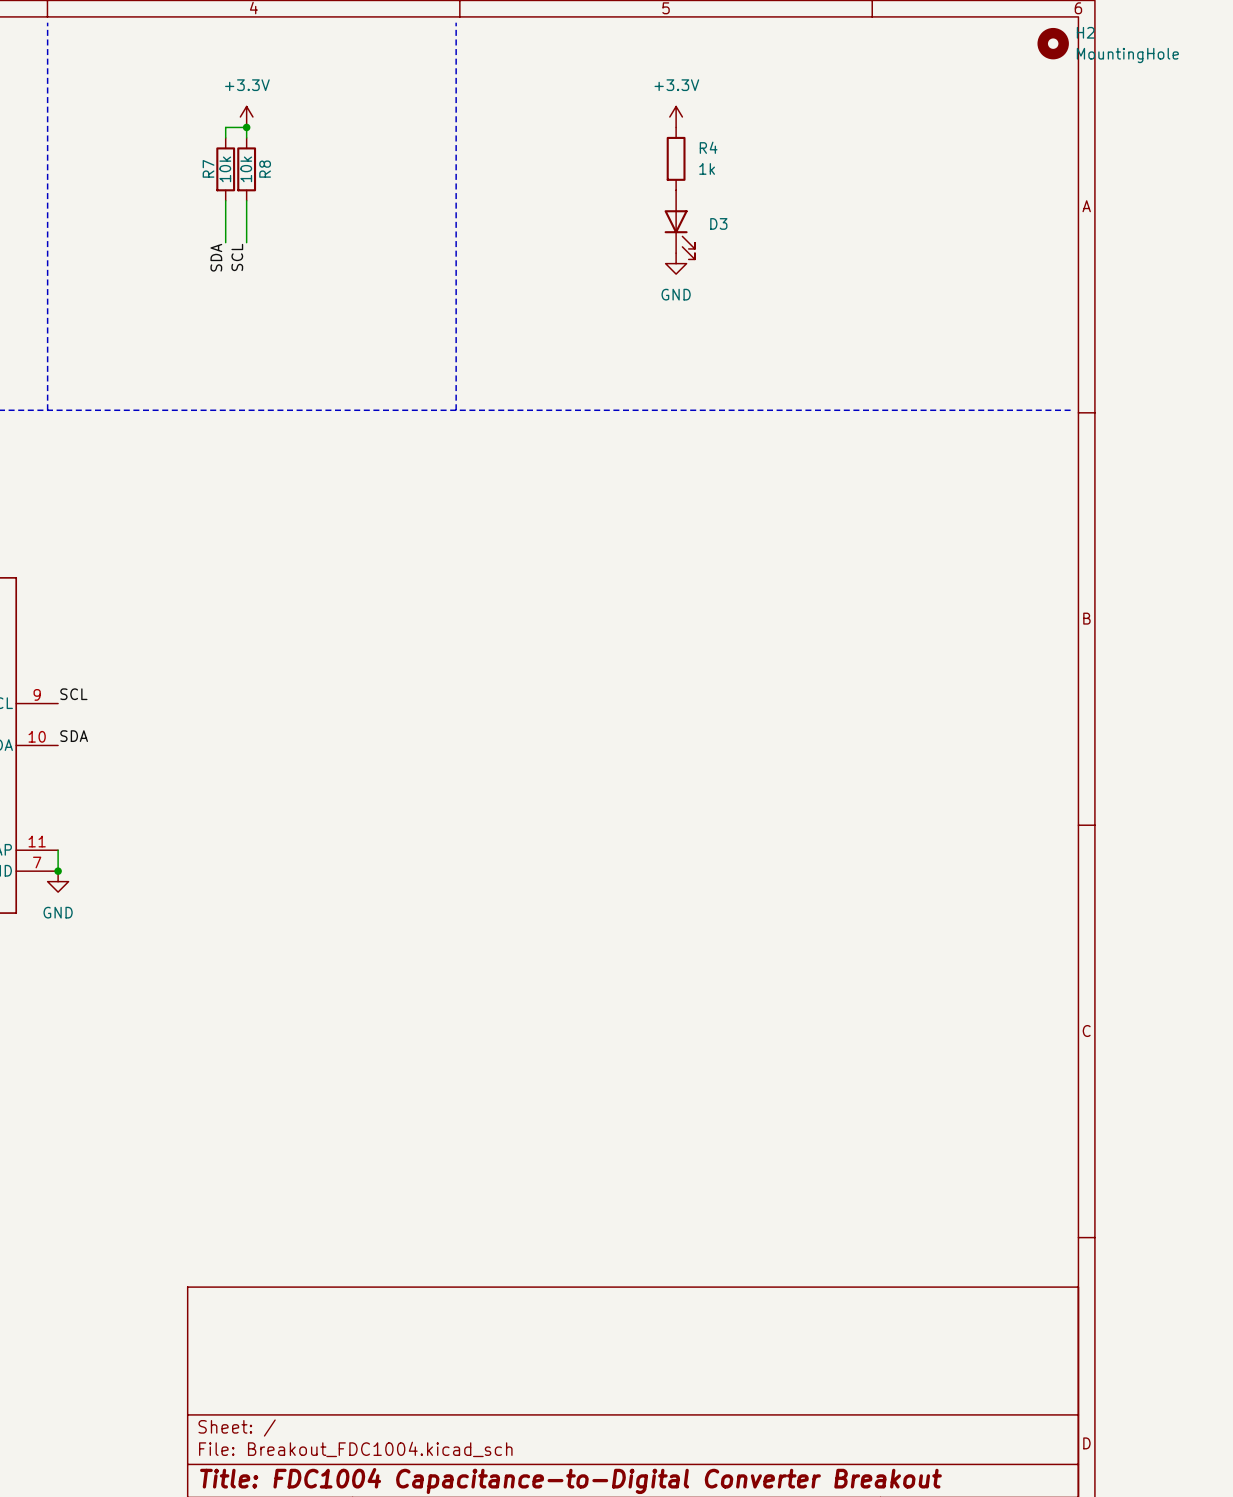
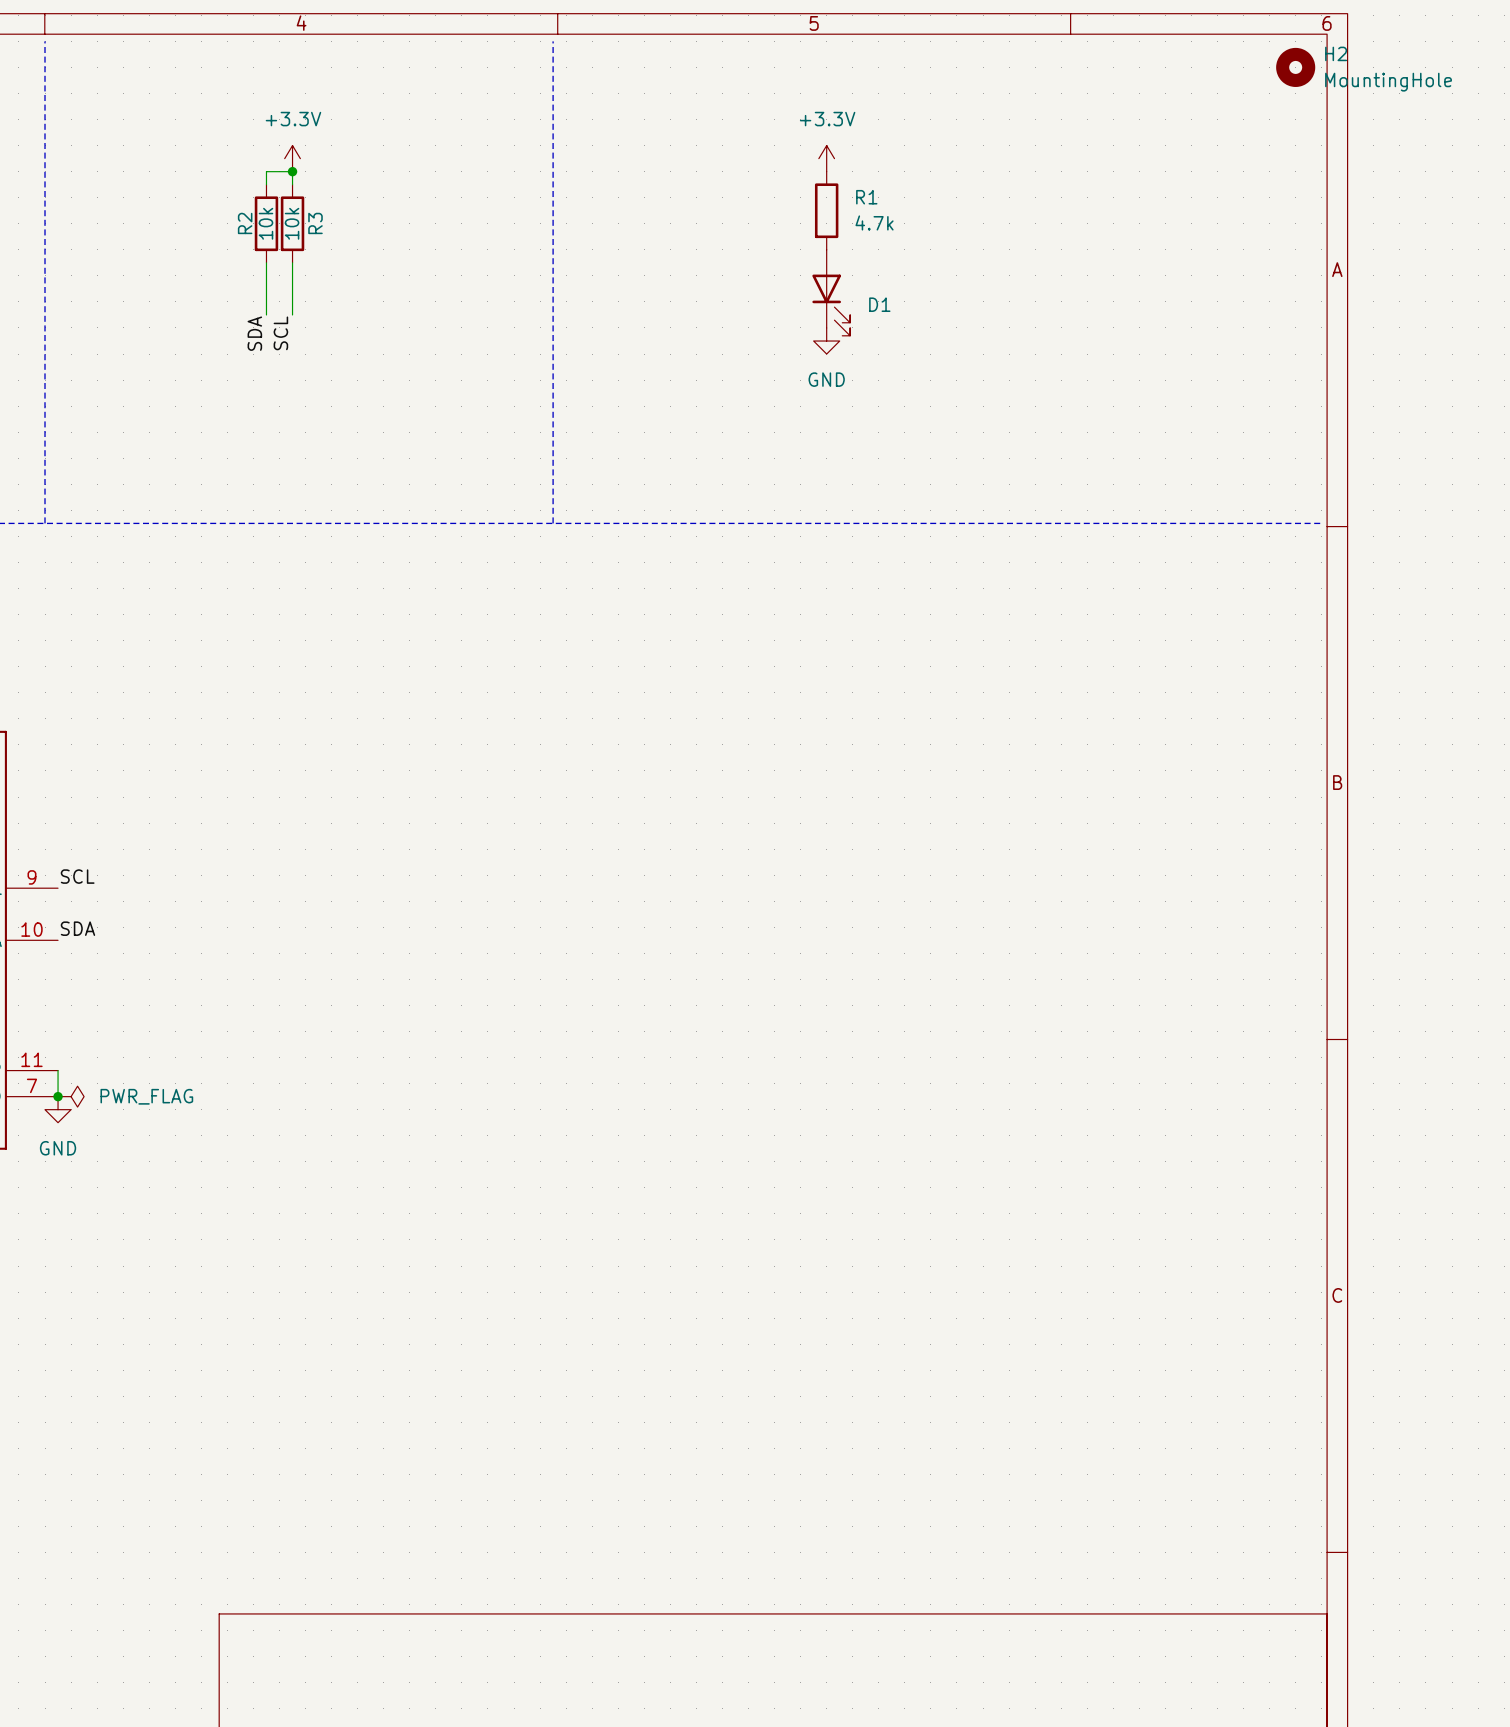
R4 name: R4 (708, 147) -> R1 (866, 197)
R7 name: R7 (208, 168) -> R2 (245, 223)
R4 value: 1k (707, 168) -> 4.7k (874, 222)
R8 name: R8 (265, 169) -> R3 (315, 223)
D3 name: D3 (718, 223) -> D1 (879, 304)
power symbol: none -> PWR_FLAG (71, 1096)

